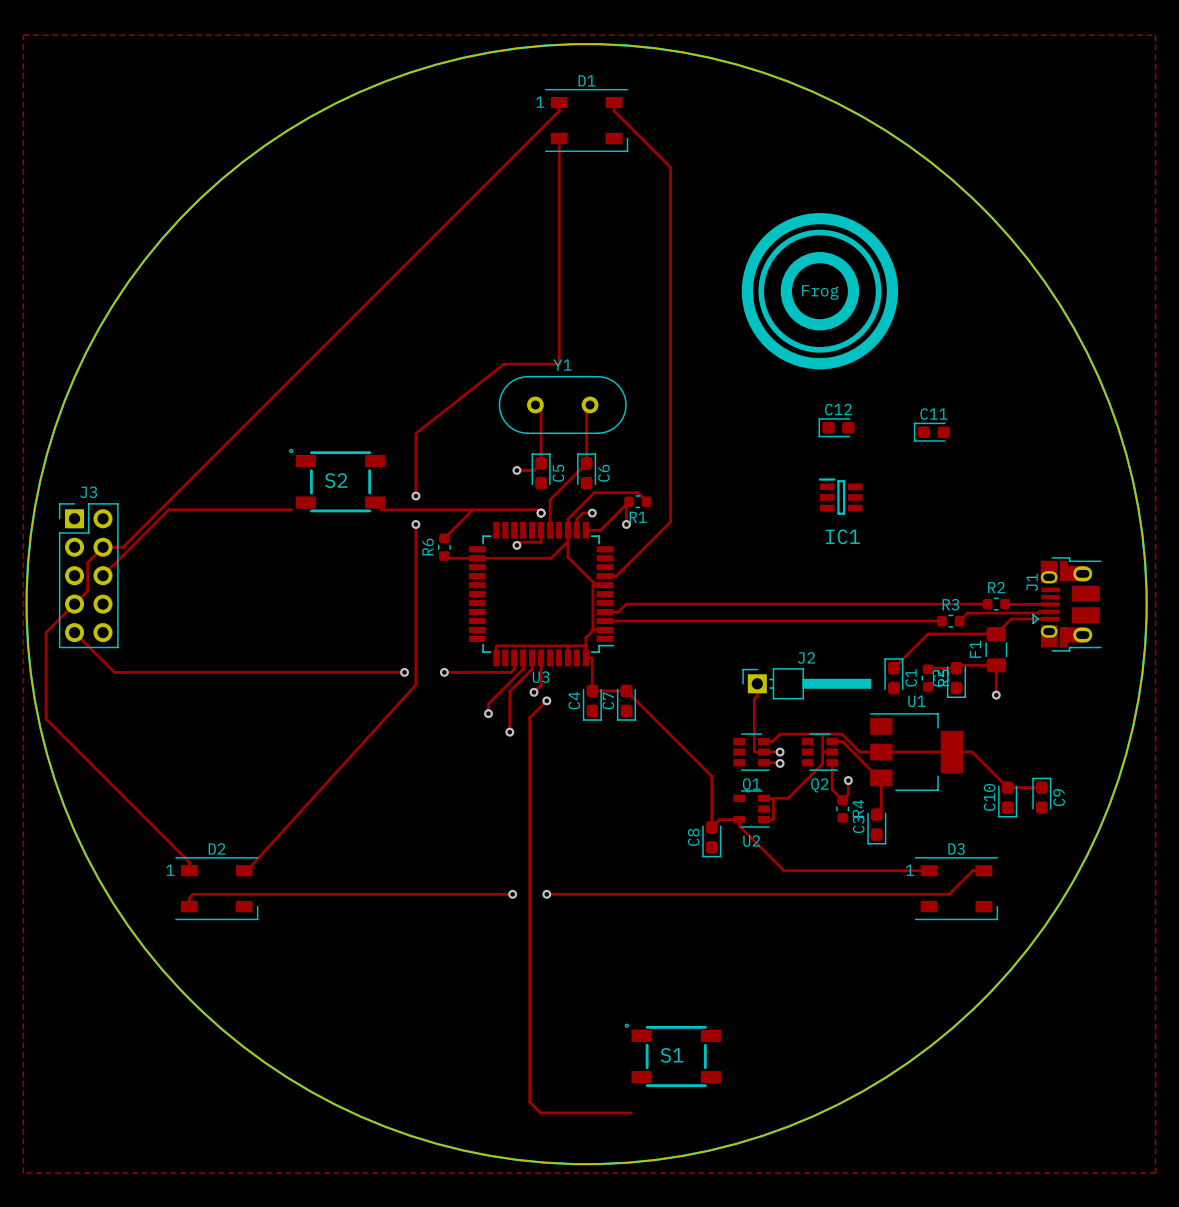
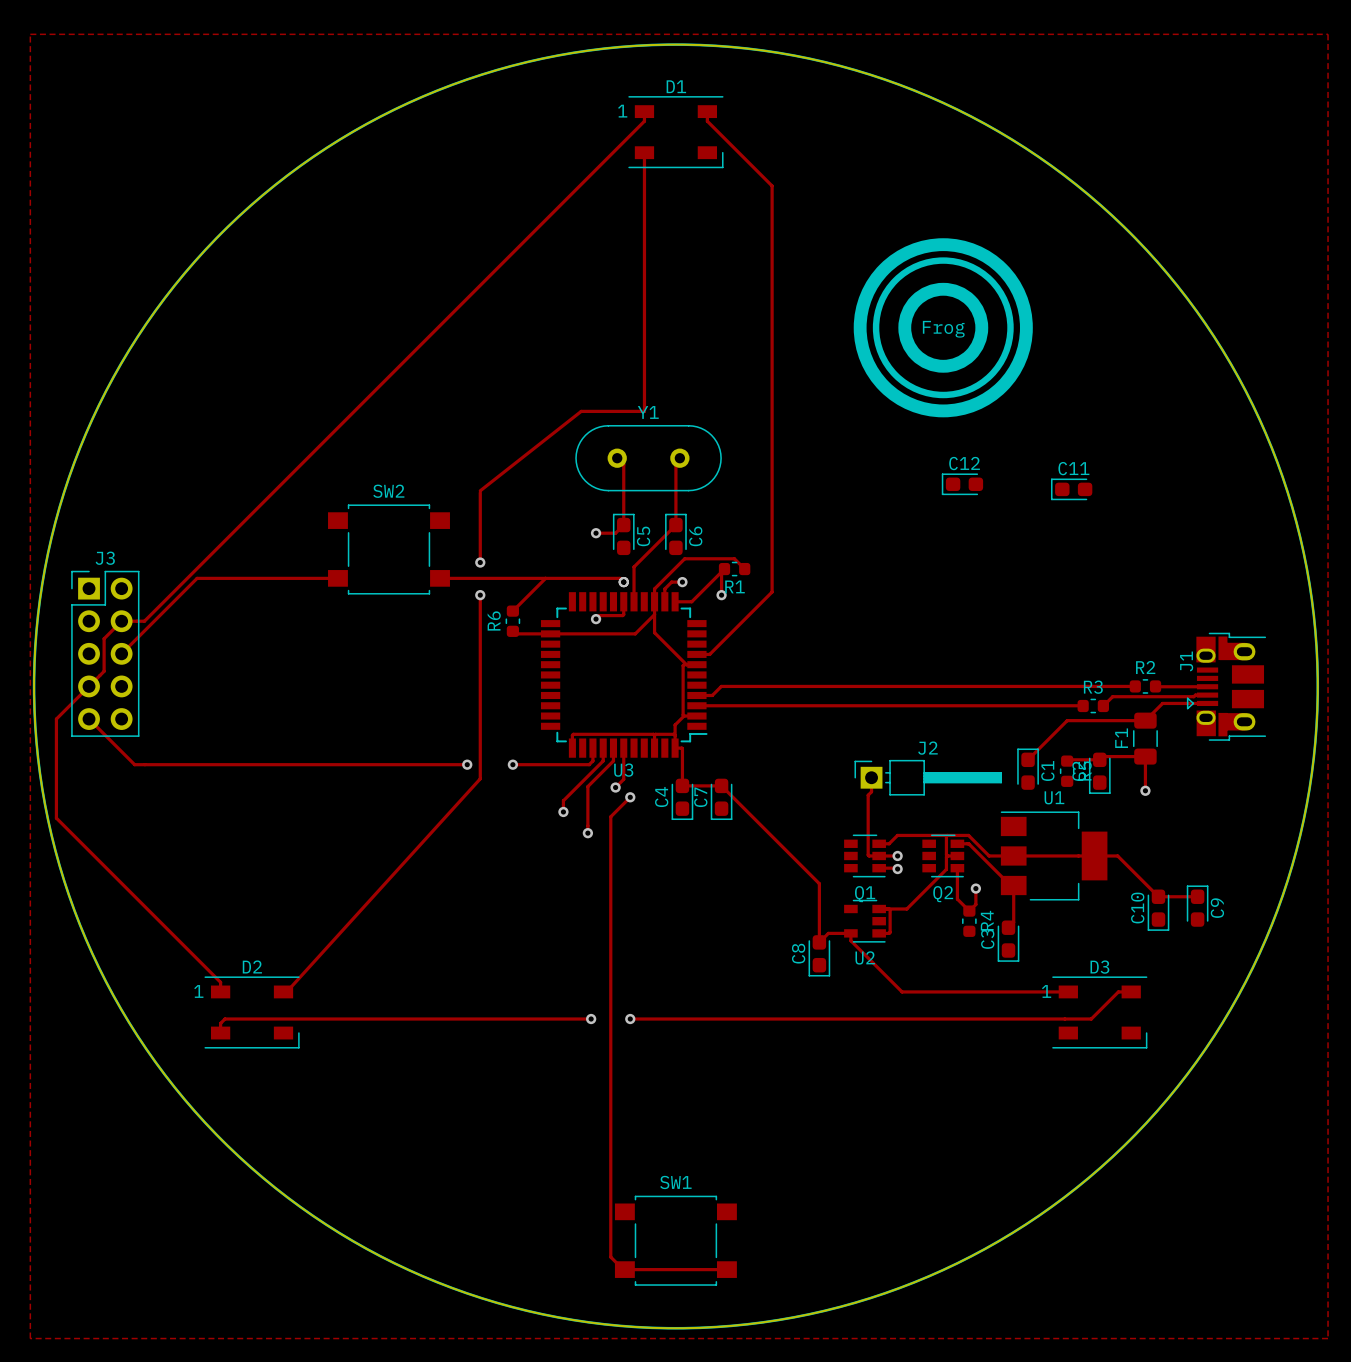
S2: (337, 480) -> none
SW2: none -> (388, 549)
IC1: (840, 496) -> none
S1: (672, 1055) -> none
SW1: none -> (675, 1240)

